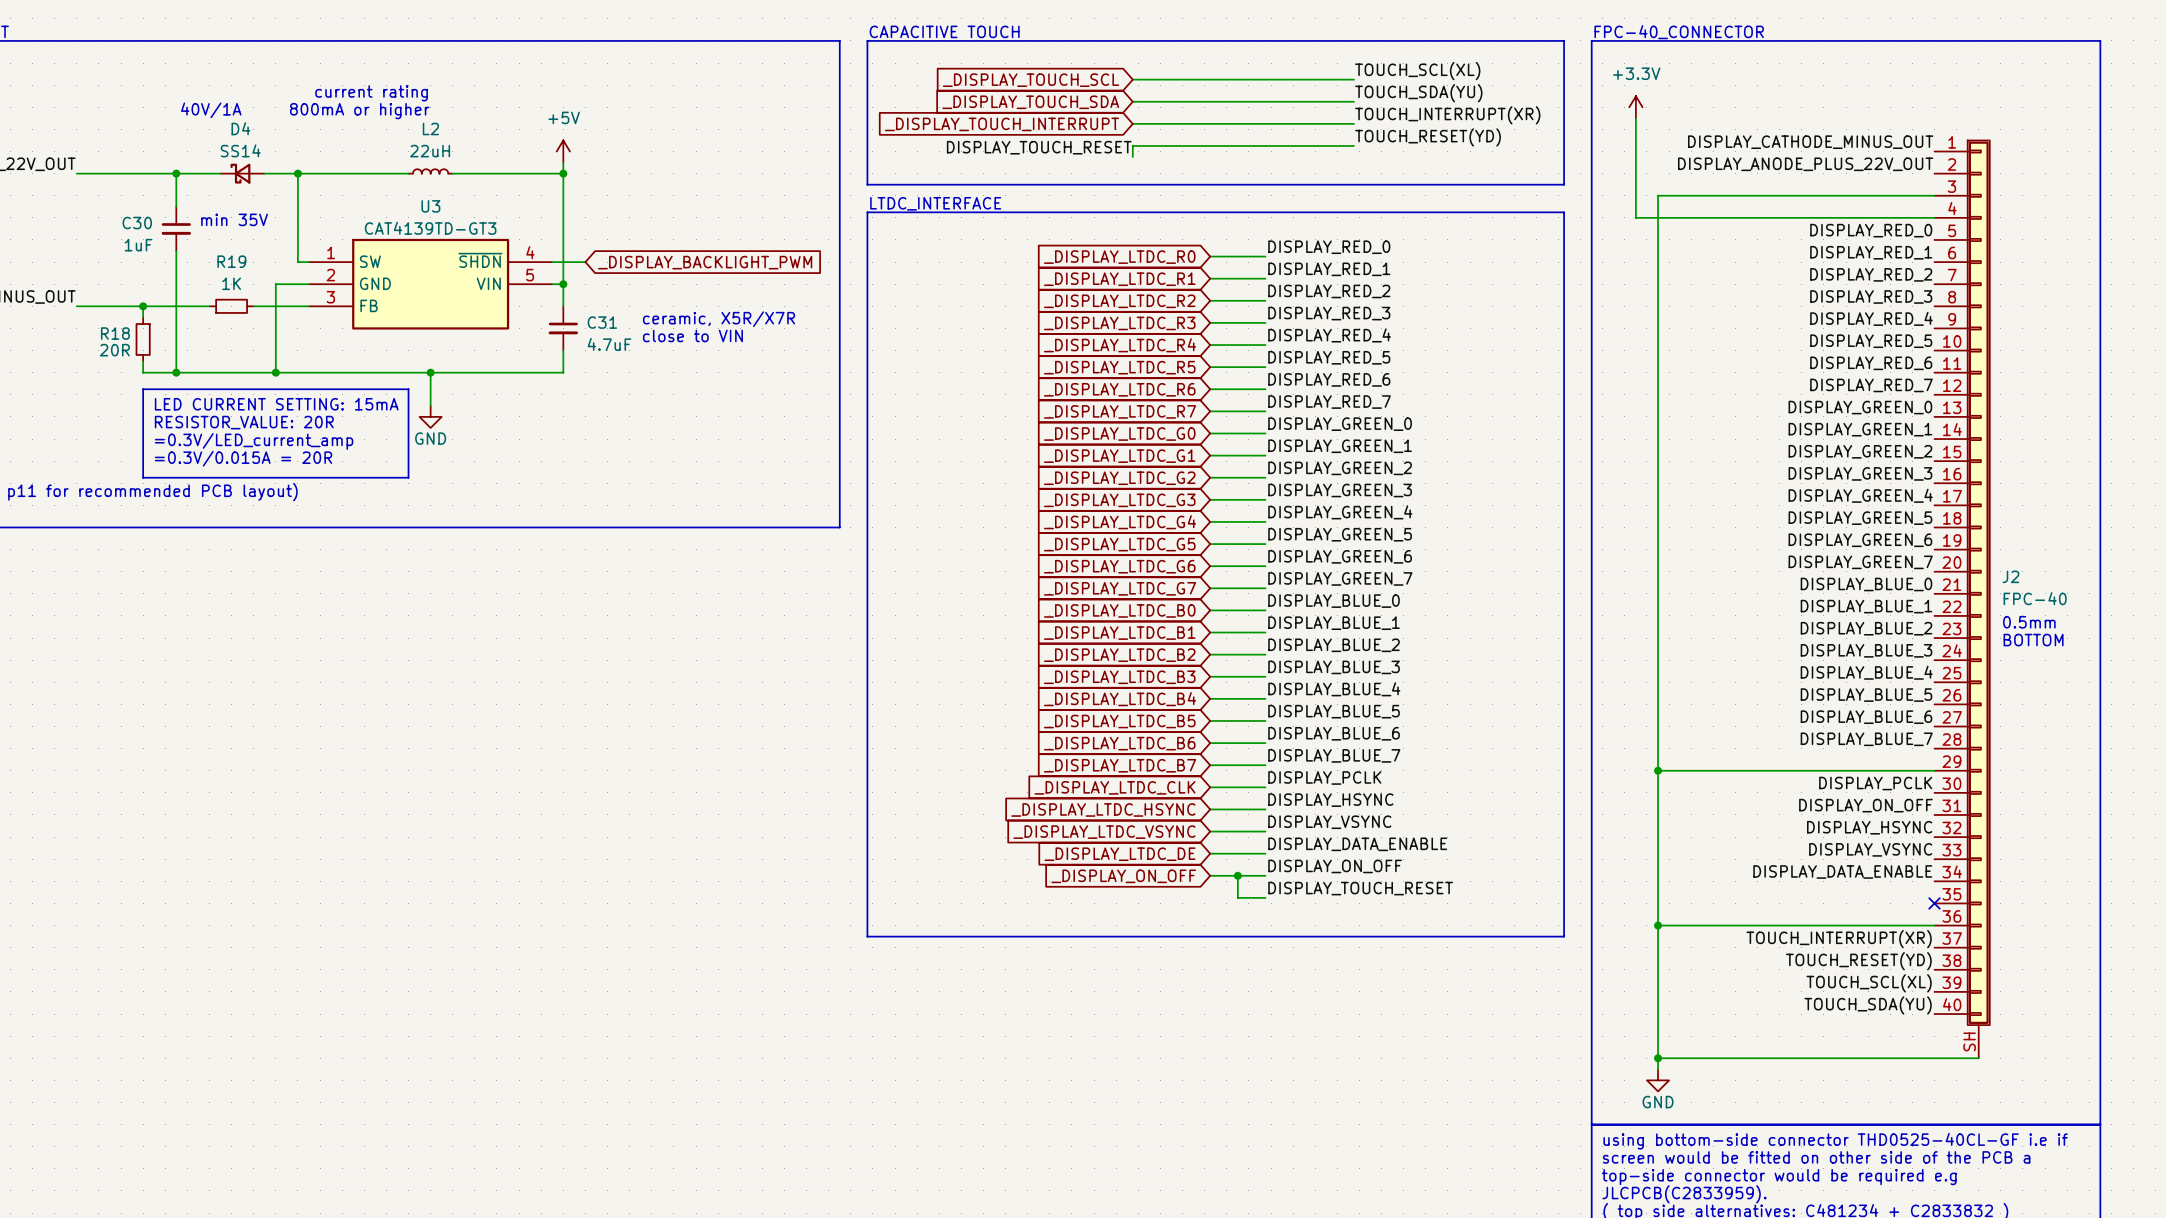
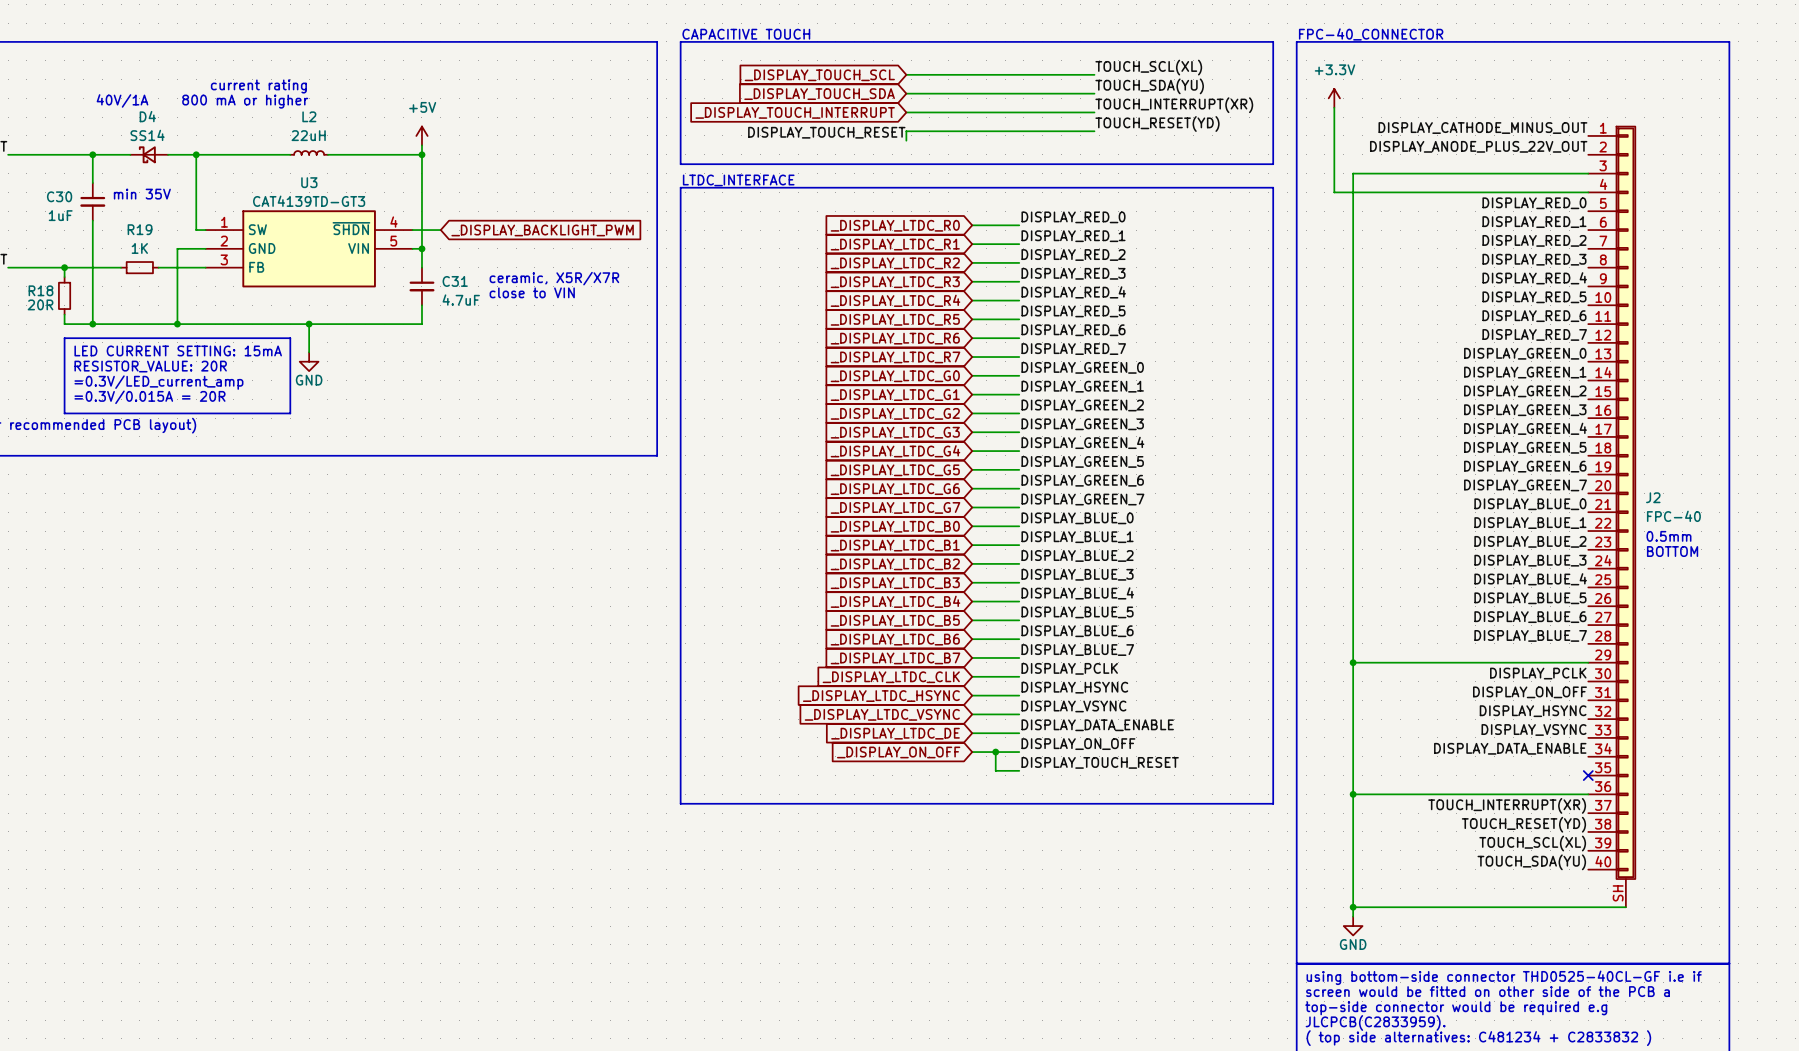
text: 800mA or higher (359, 111) -> 800 mA or higher (245, 101)

